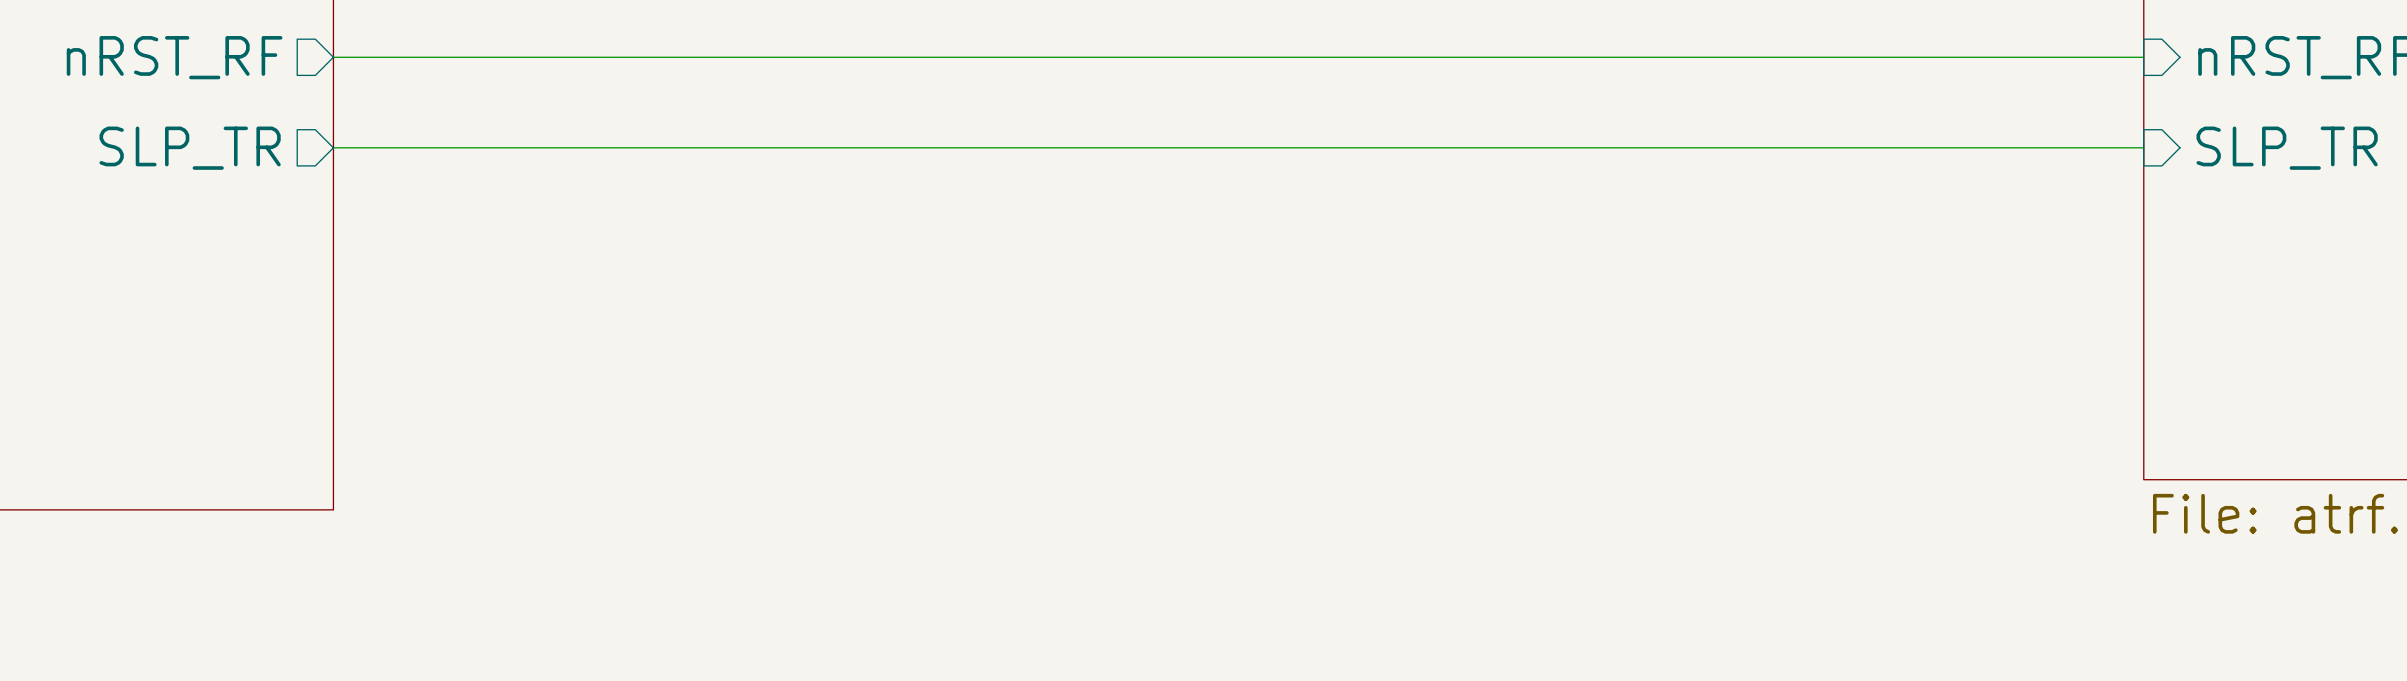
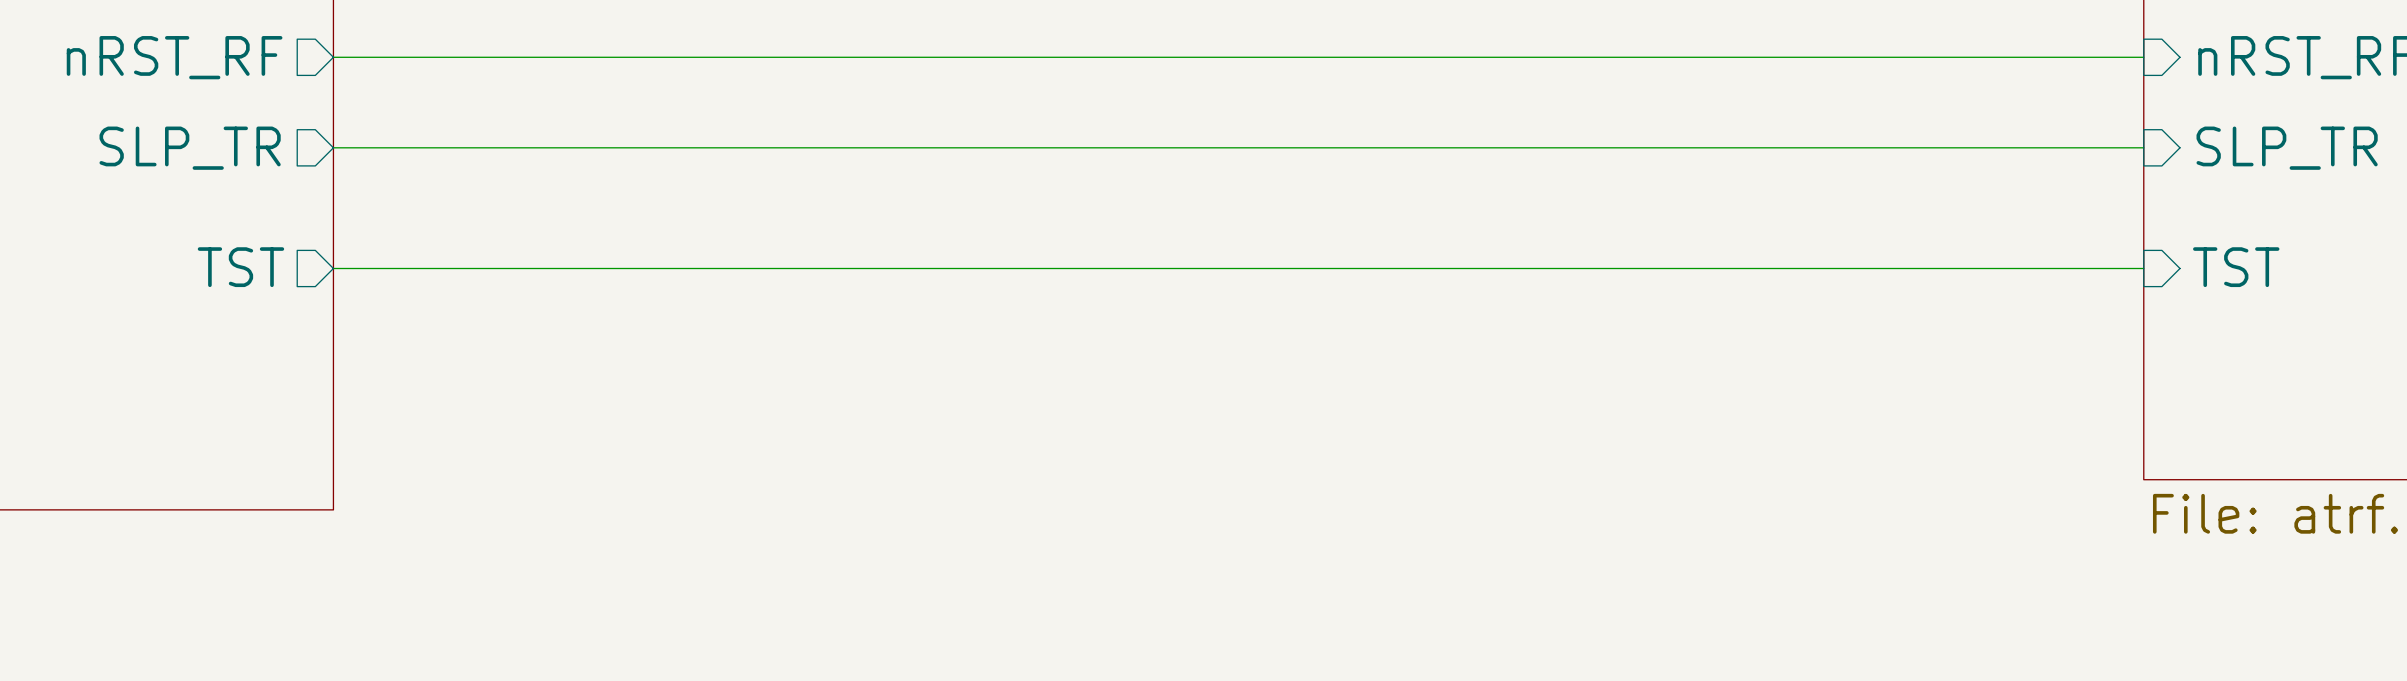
sheet pin: none -> TST (240, 267)
sheet pin: none -> TST (2236, 267)
wire: none -> (333, 268) (2143, 268)

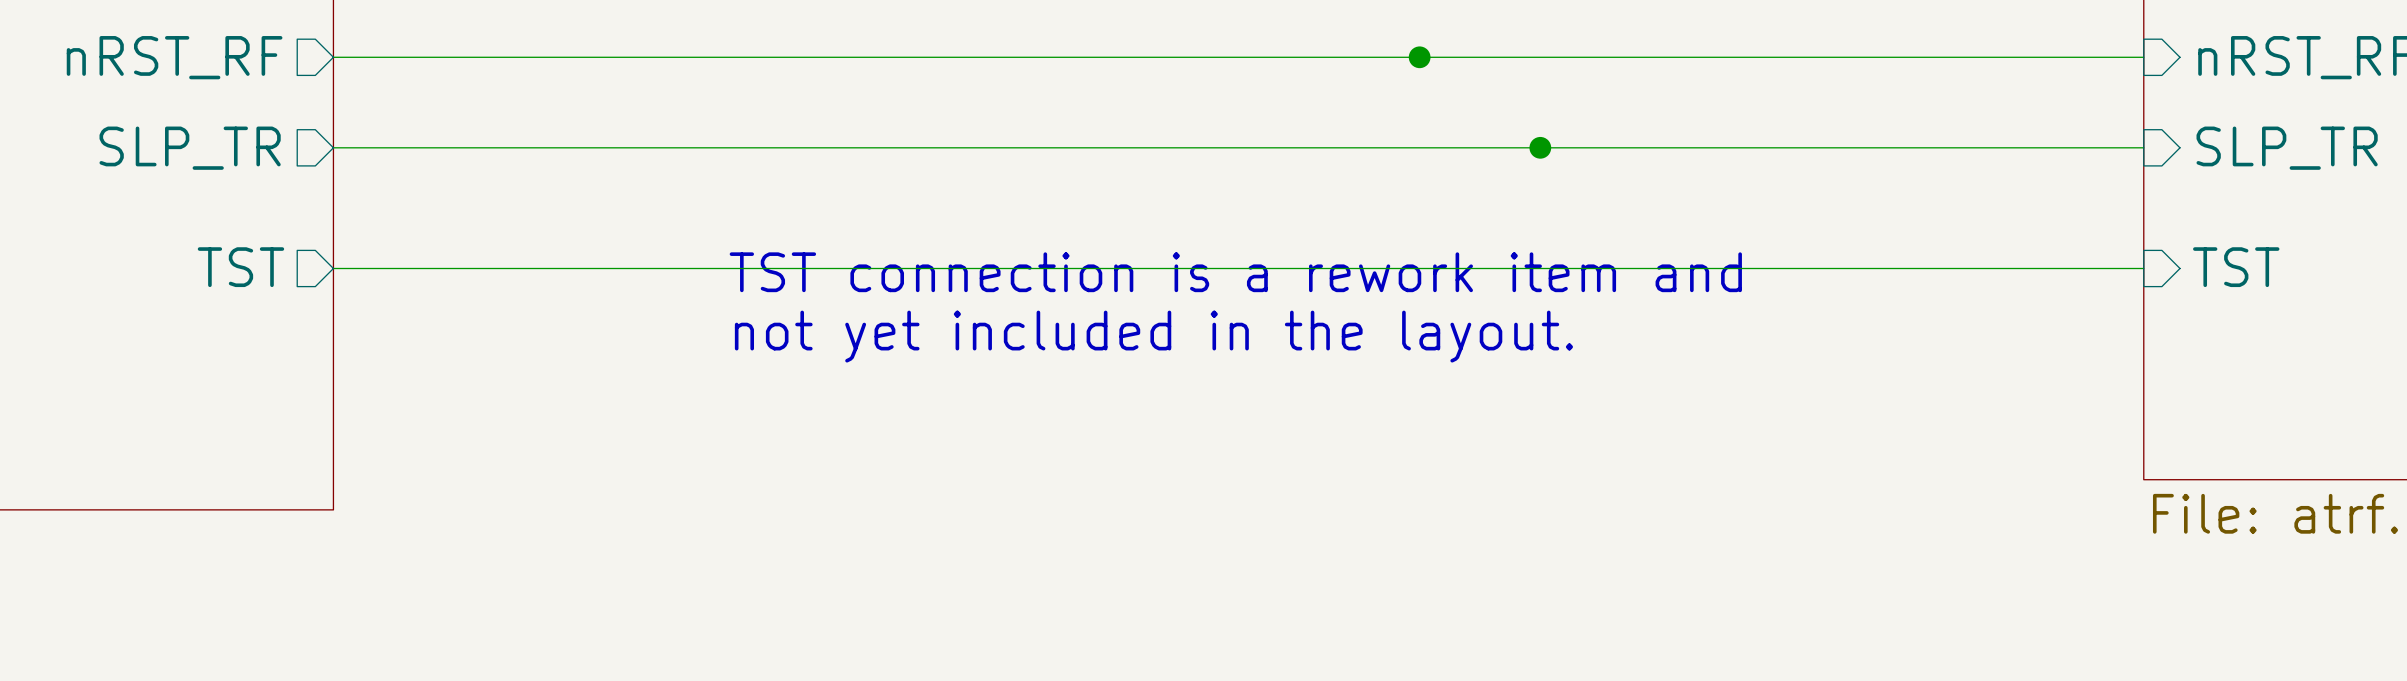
junction: none -> (1419, 57)
junction: none -> (1540, 147)
text: none -> TST connection is a rework item and (1235, 272)
text: none -> not yet included in the layout. (1153, 336)

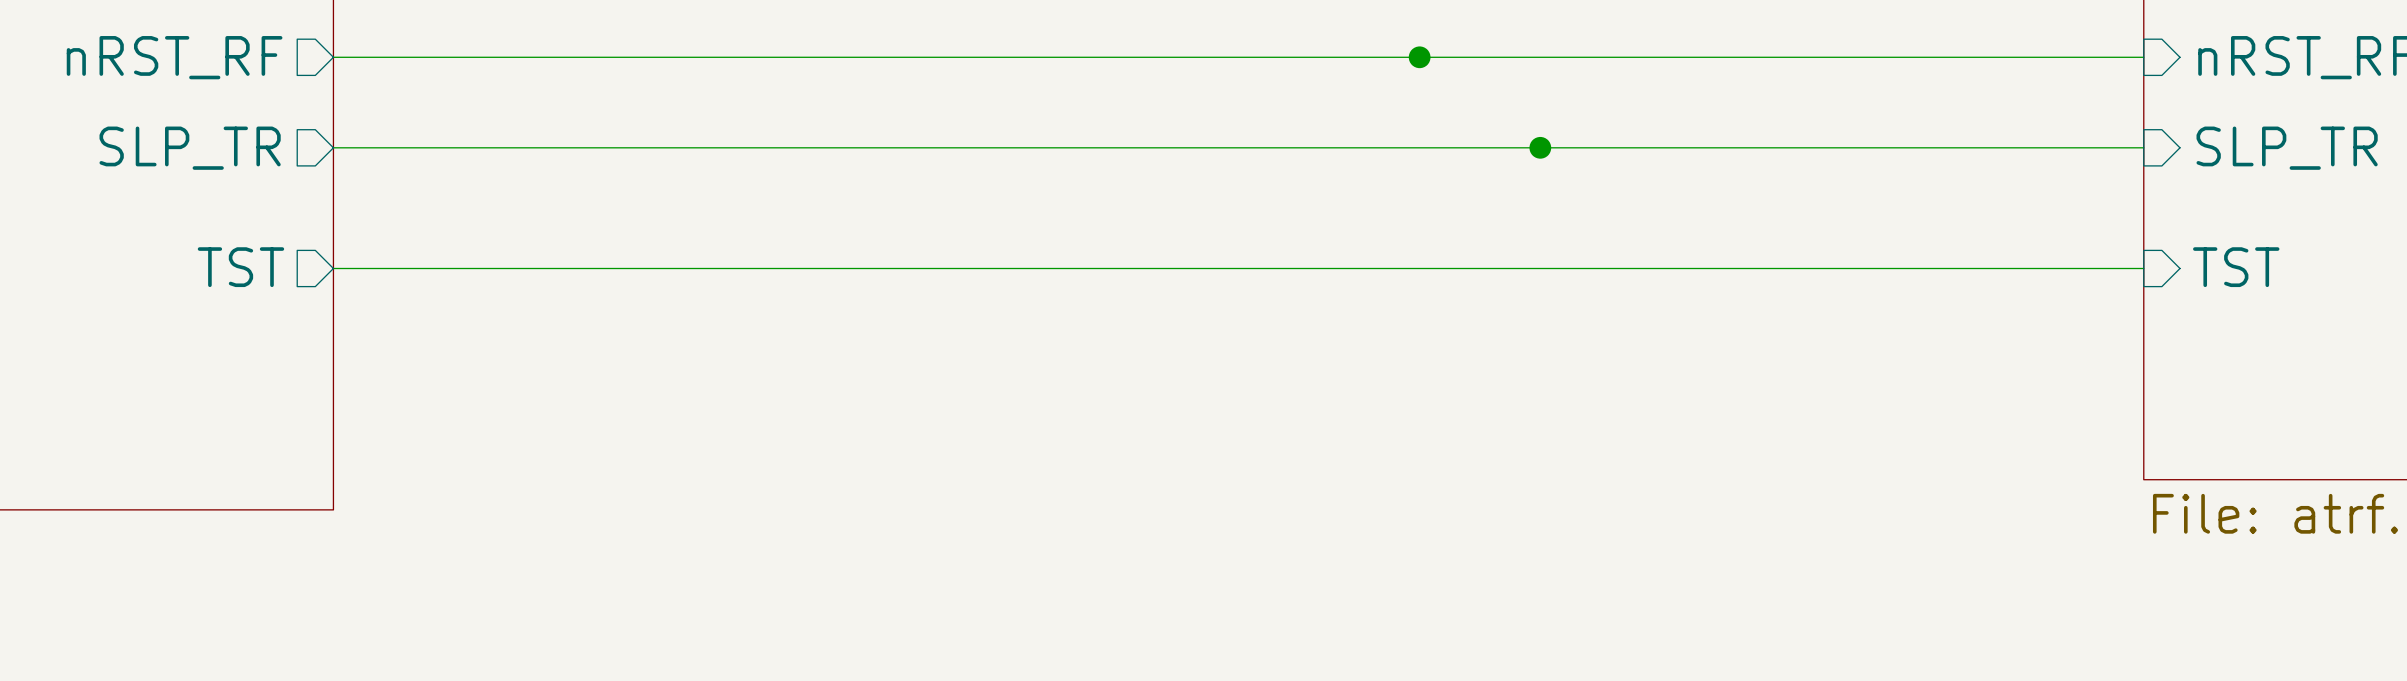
text: TST connection is a rework item and (1235, 272) -> none
text: not yet included in the layout. (1153, 336) -> none

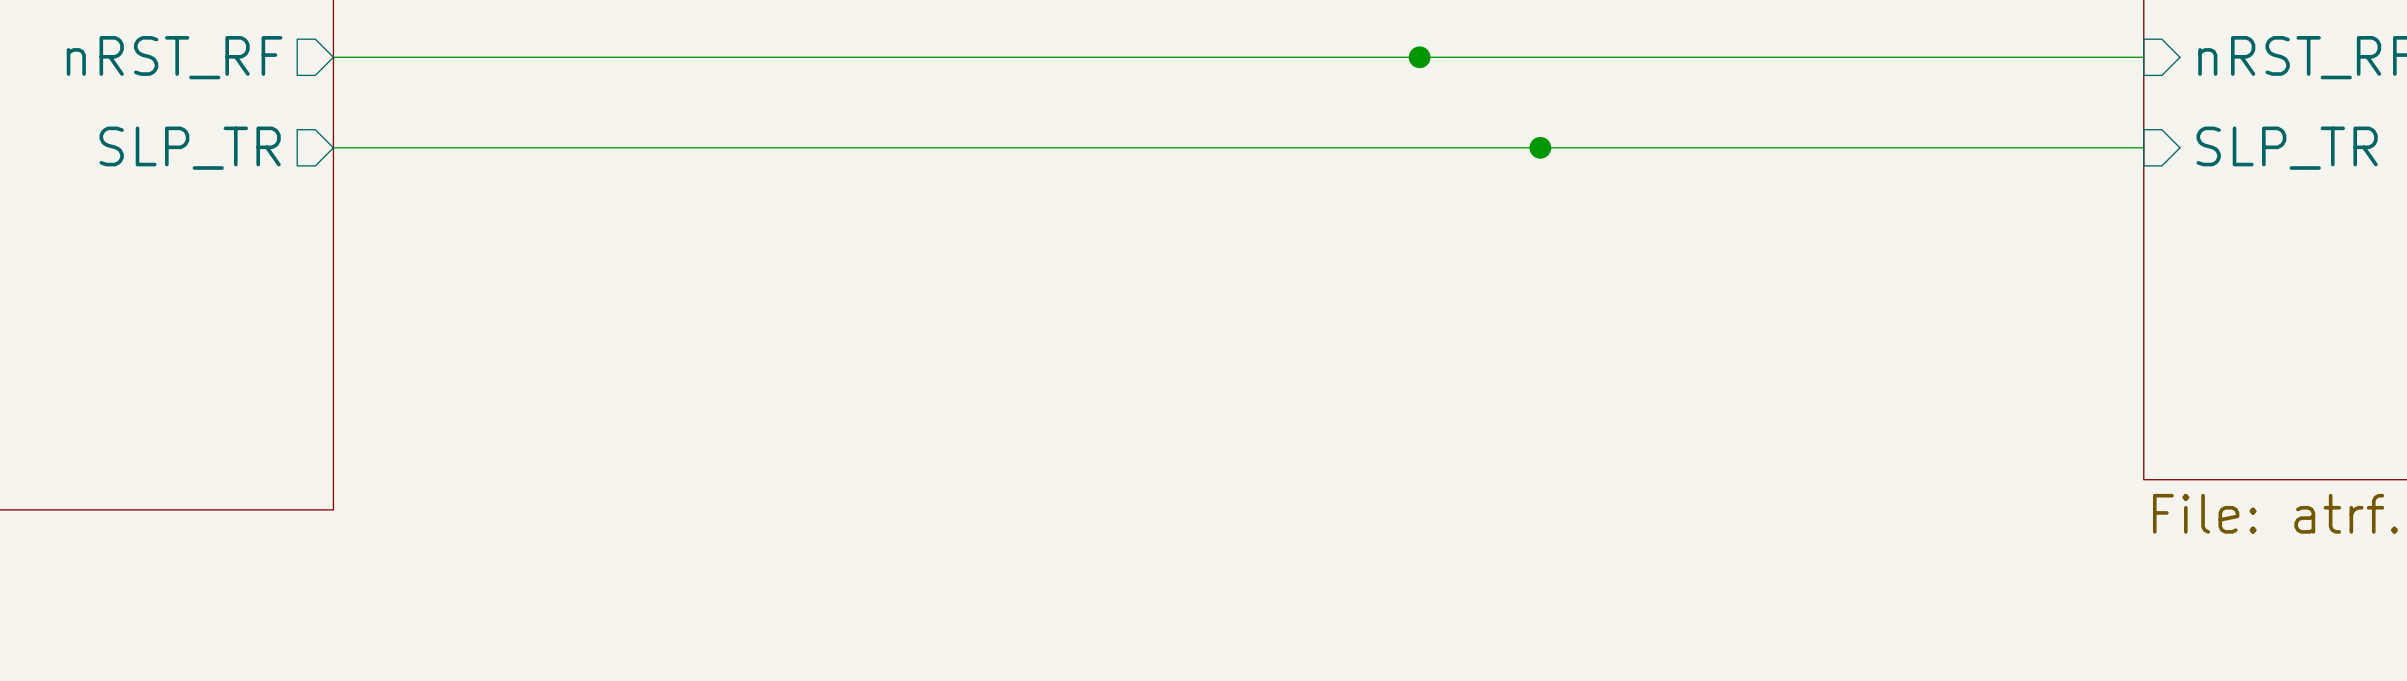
sheet pin: TST (240, 267) -> none
sheet pin: TST (2236, 267) -> none
wire: (333, 268) (2143, 268) -> none

